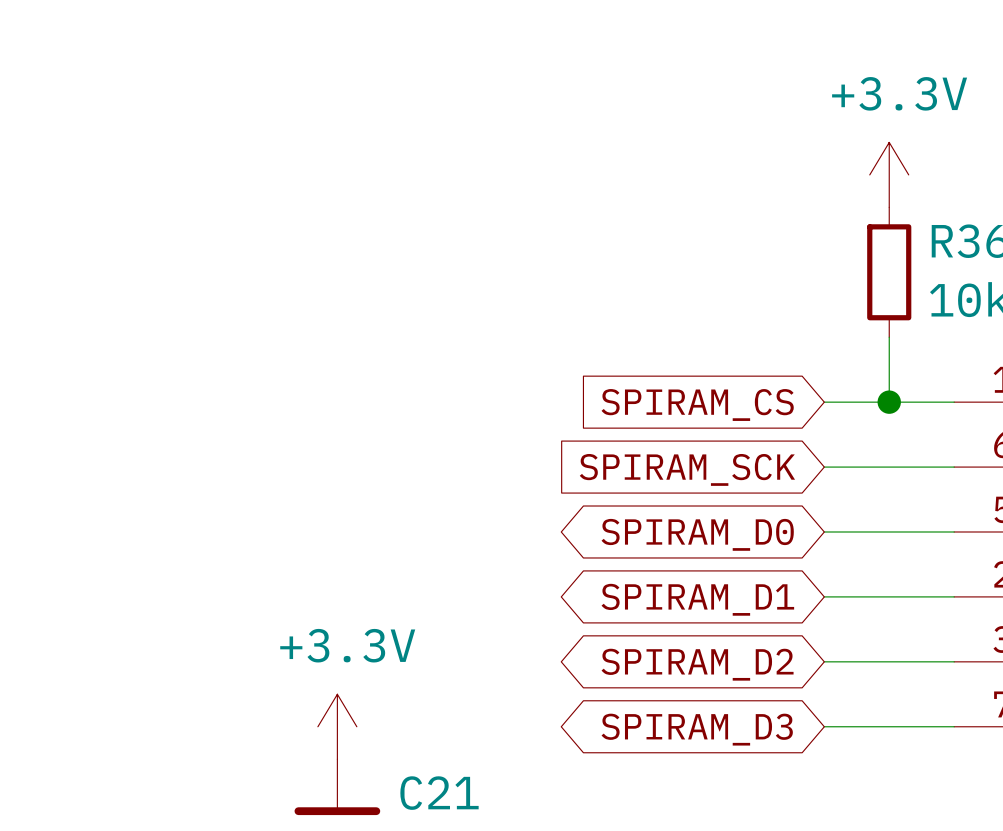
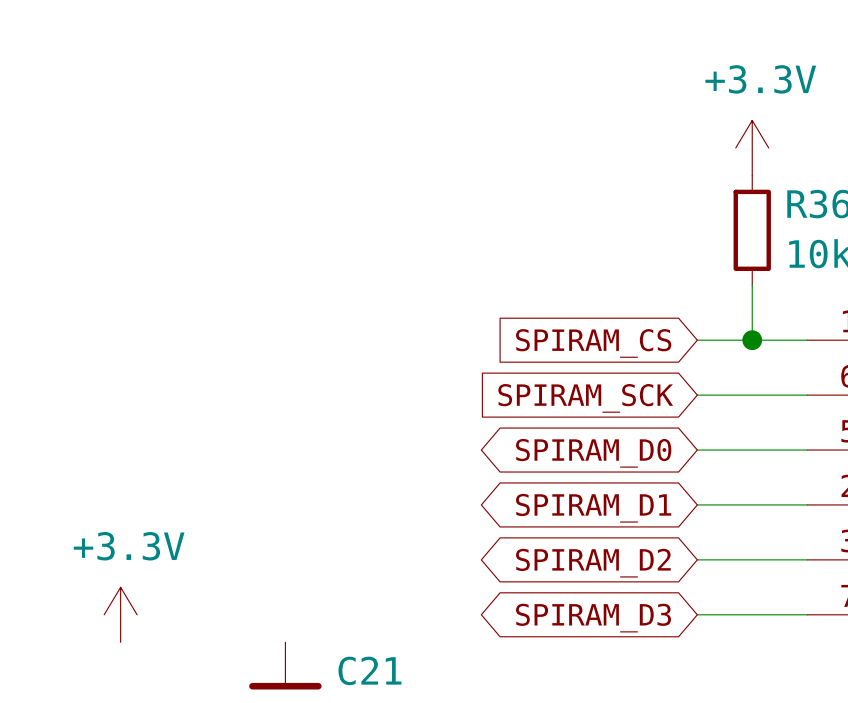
power symbol position: +3.3V (337, 726) -> +3.3V (120, 614)

